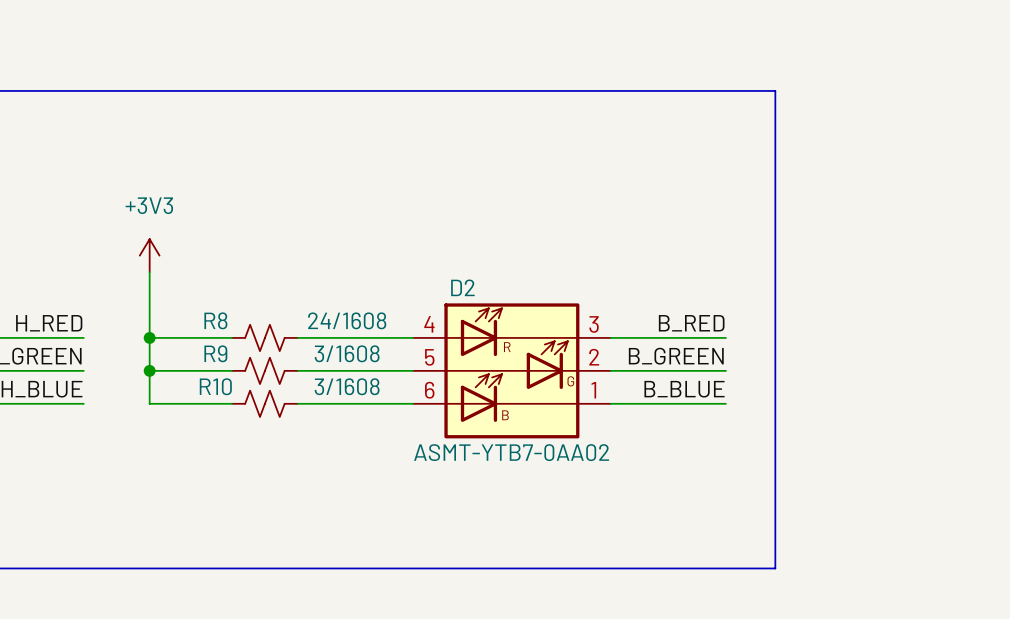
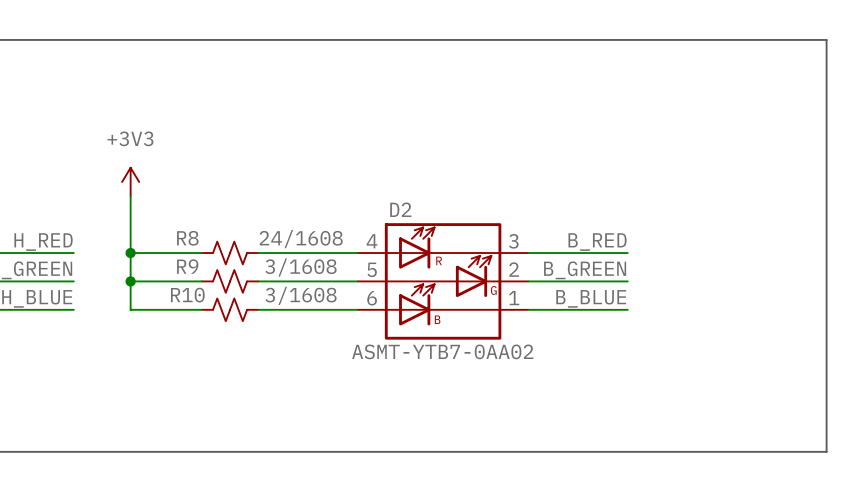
line: (775, 90) (775, 568) -> (670, 39) (826, 39) (826, 451) (670, 451)

